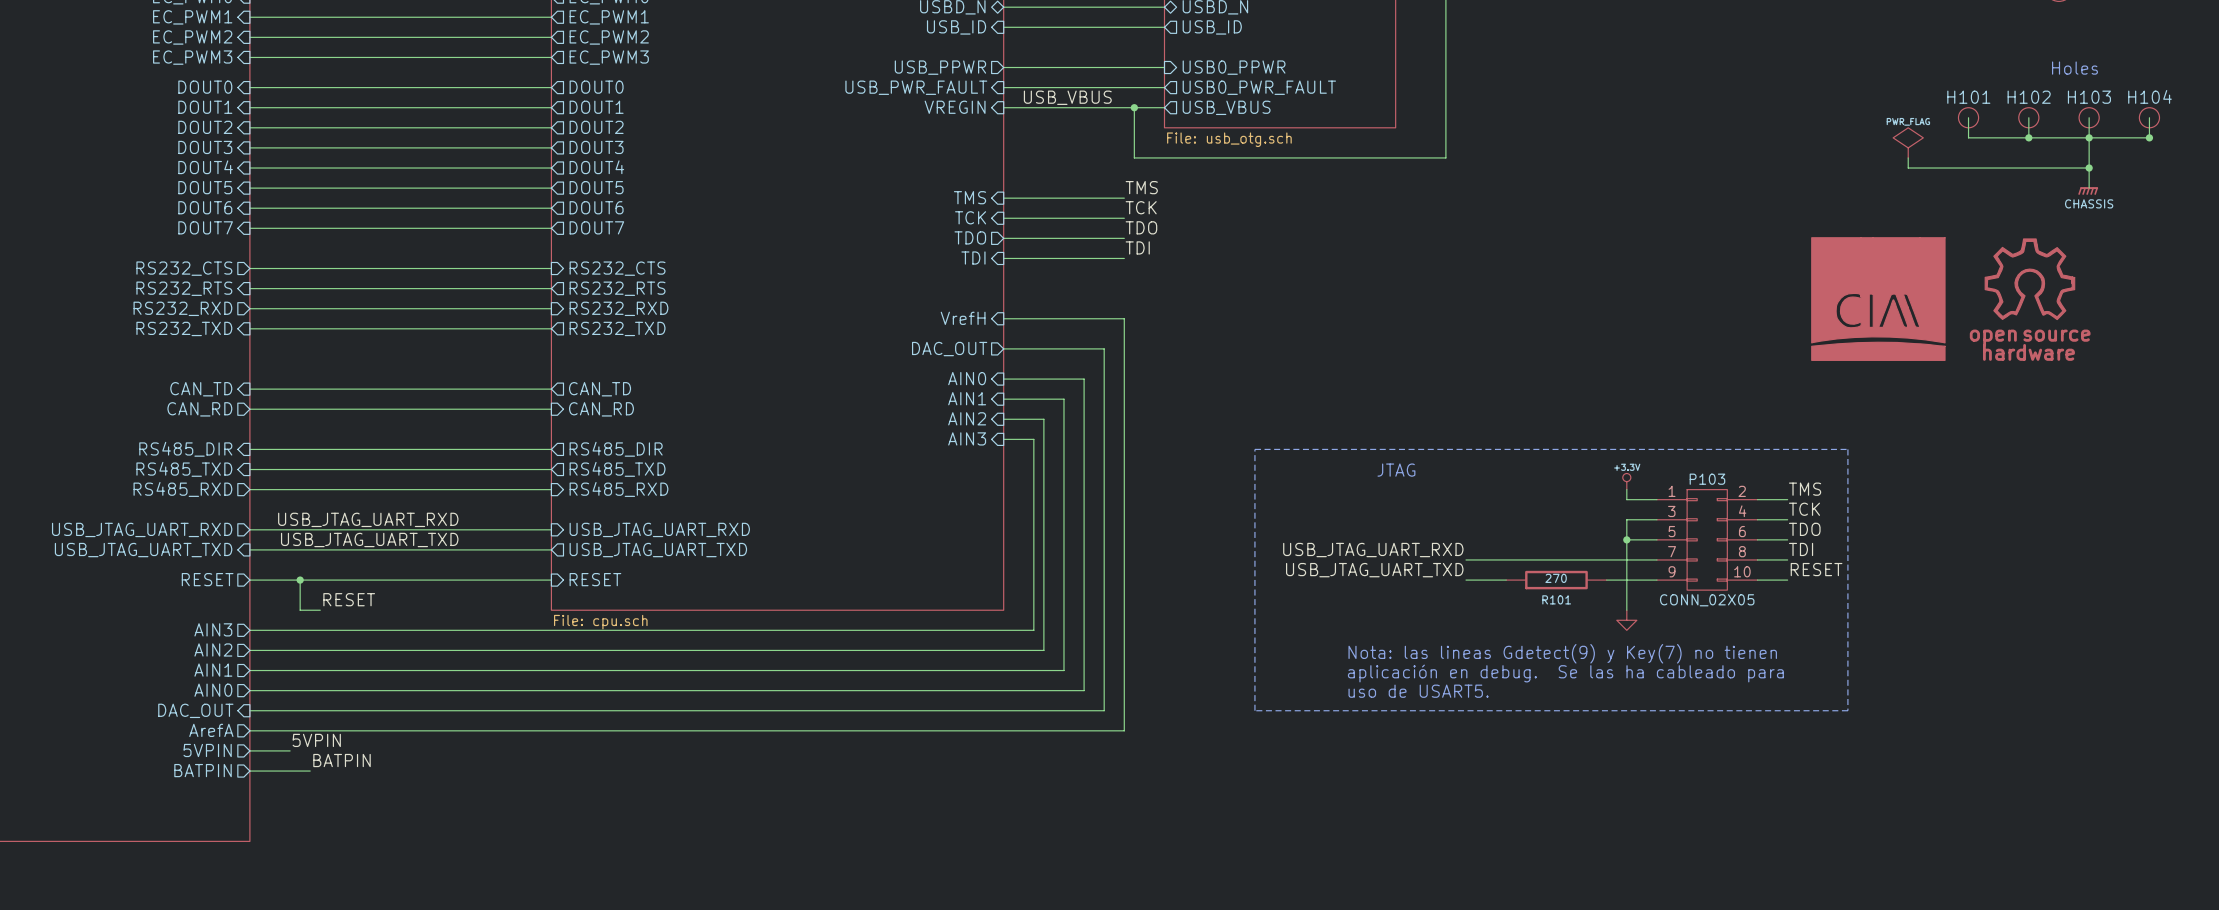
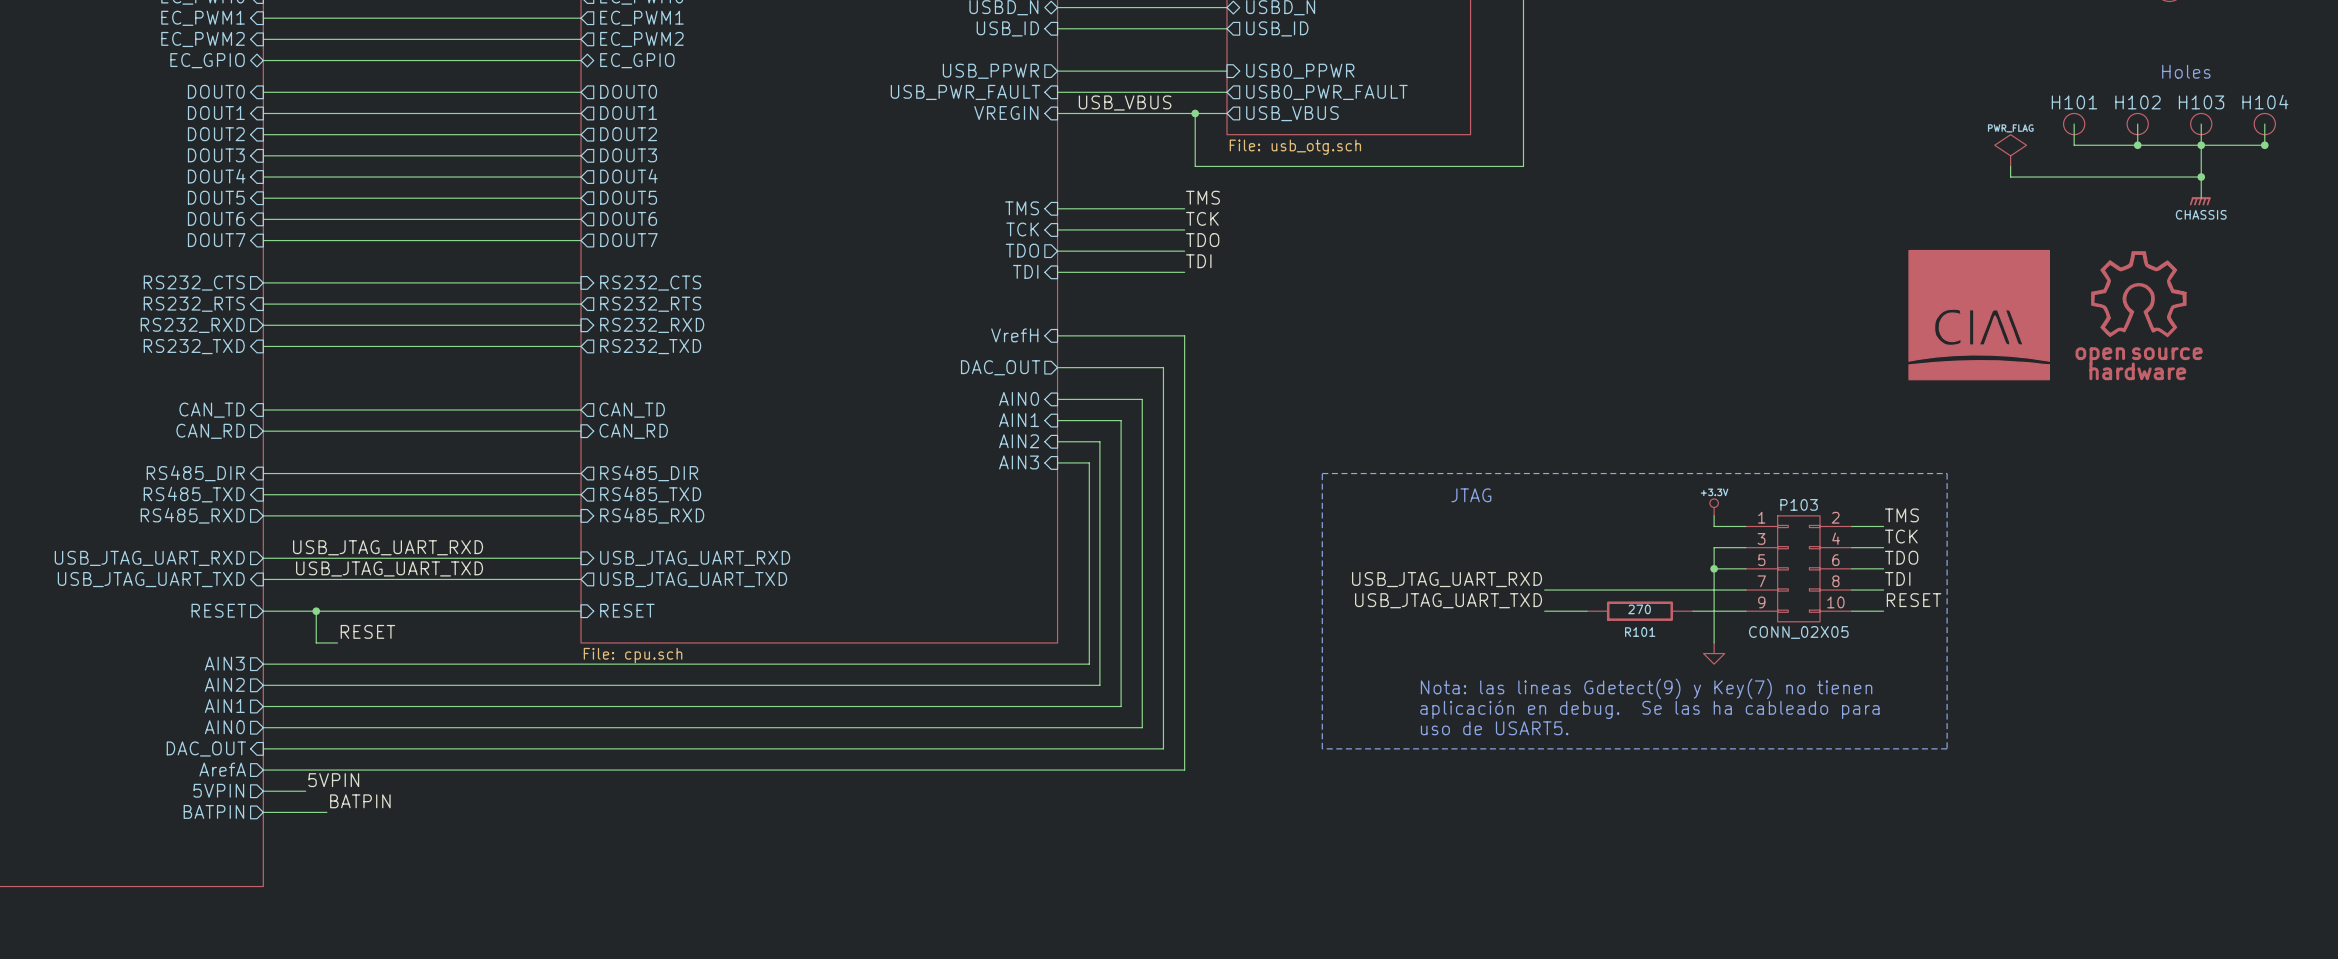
sheet pin shape: input (192, 57) -> bidirectional (207, 60)
sheet pin: EC_PWM3 (192, 57) -> EC_GPIO (207, 60)
sheet pin shape: output (609, 57) -> bidirectional (637, 60)
sheet pin: EC_PWM3 (609, 57) -> EC_GPIO (637, 60)

